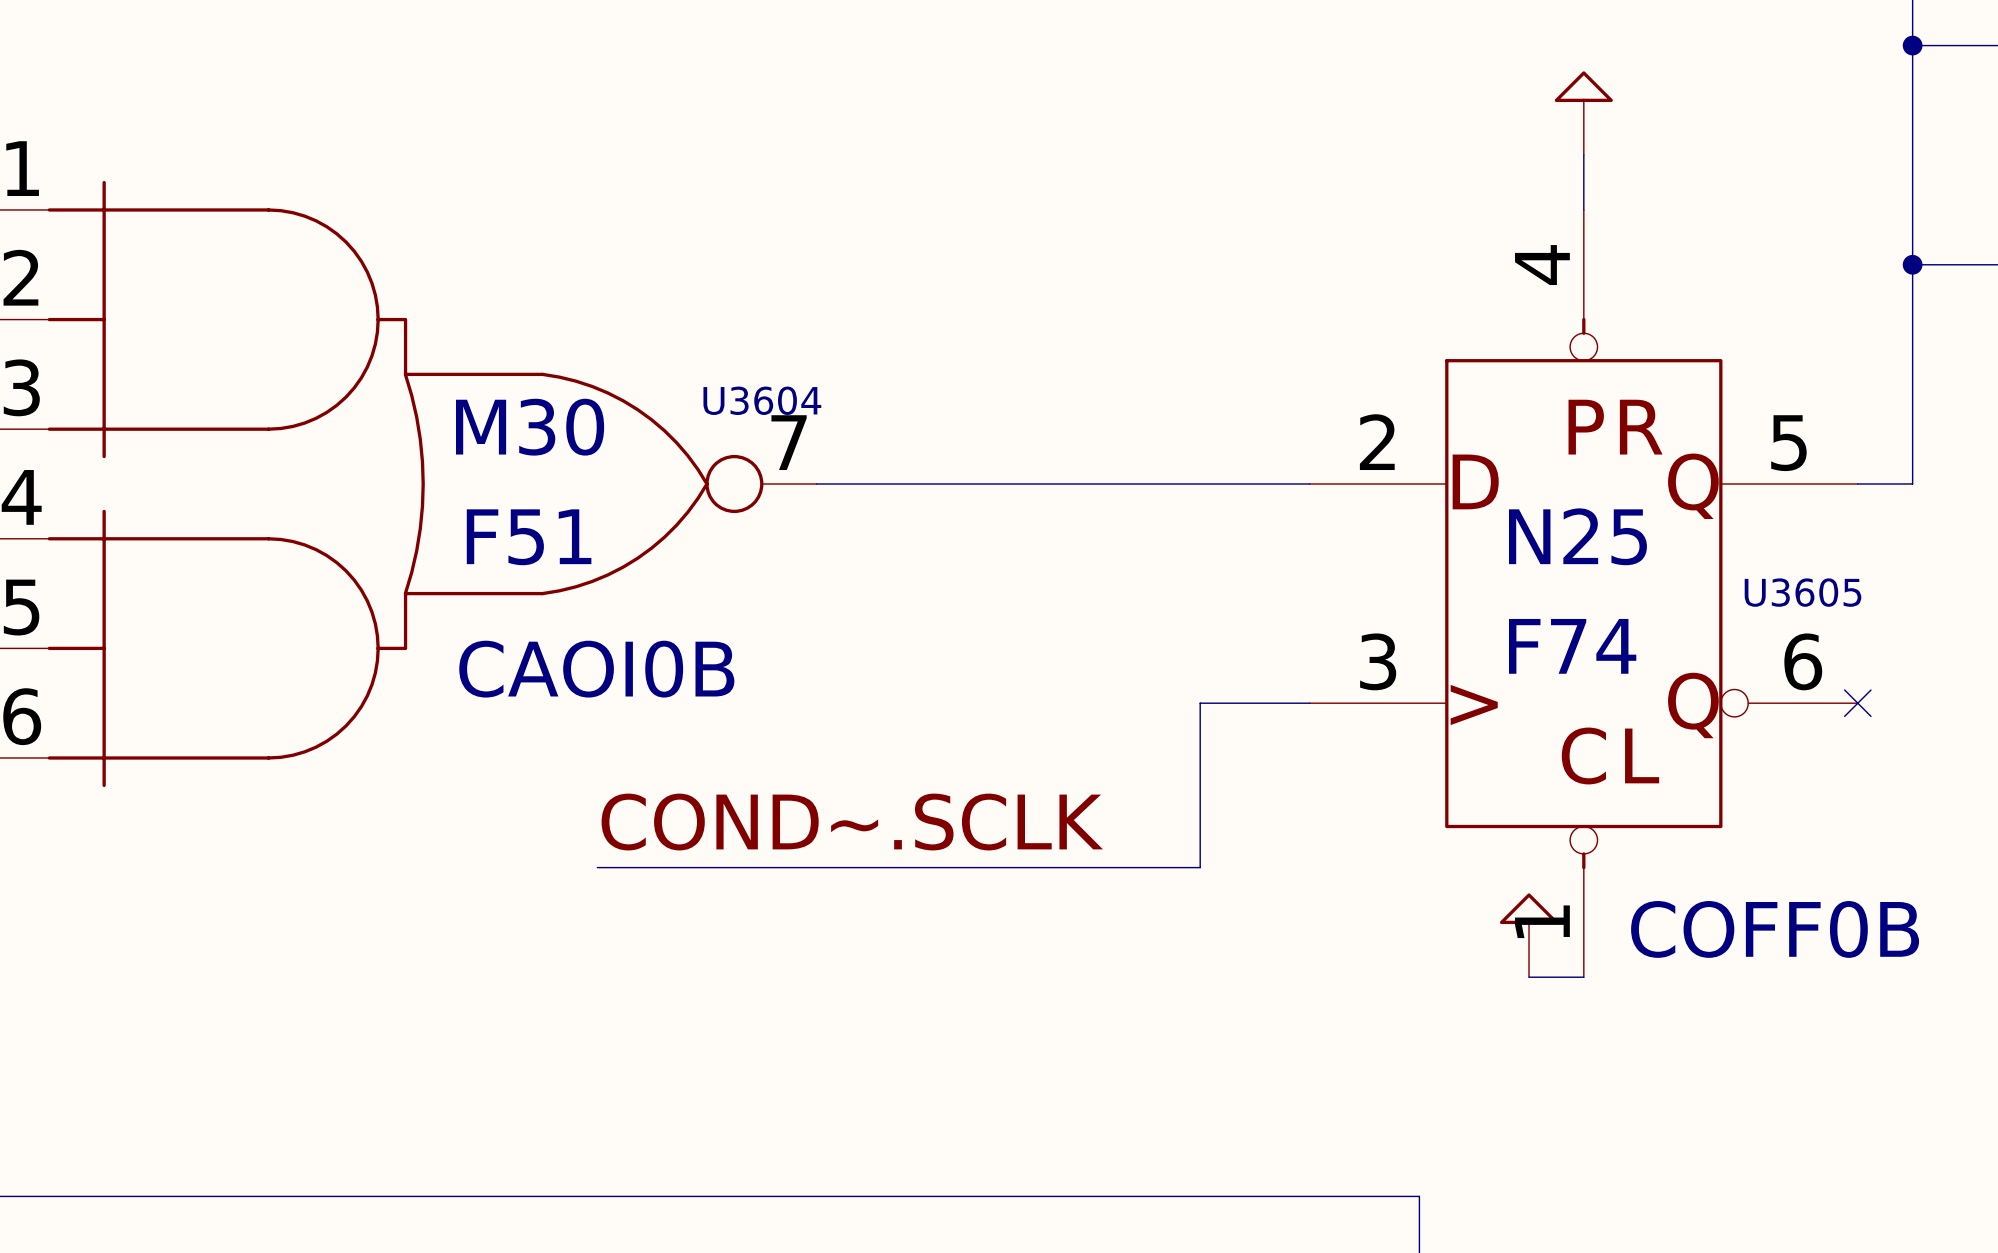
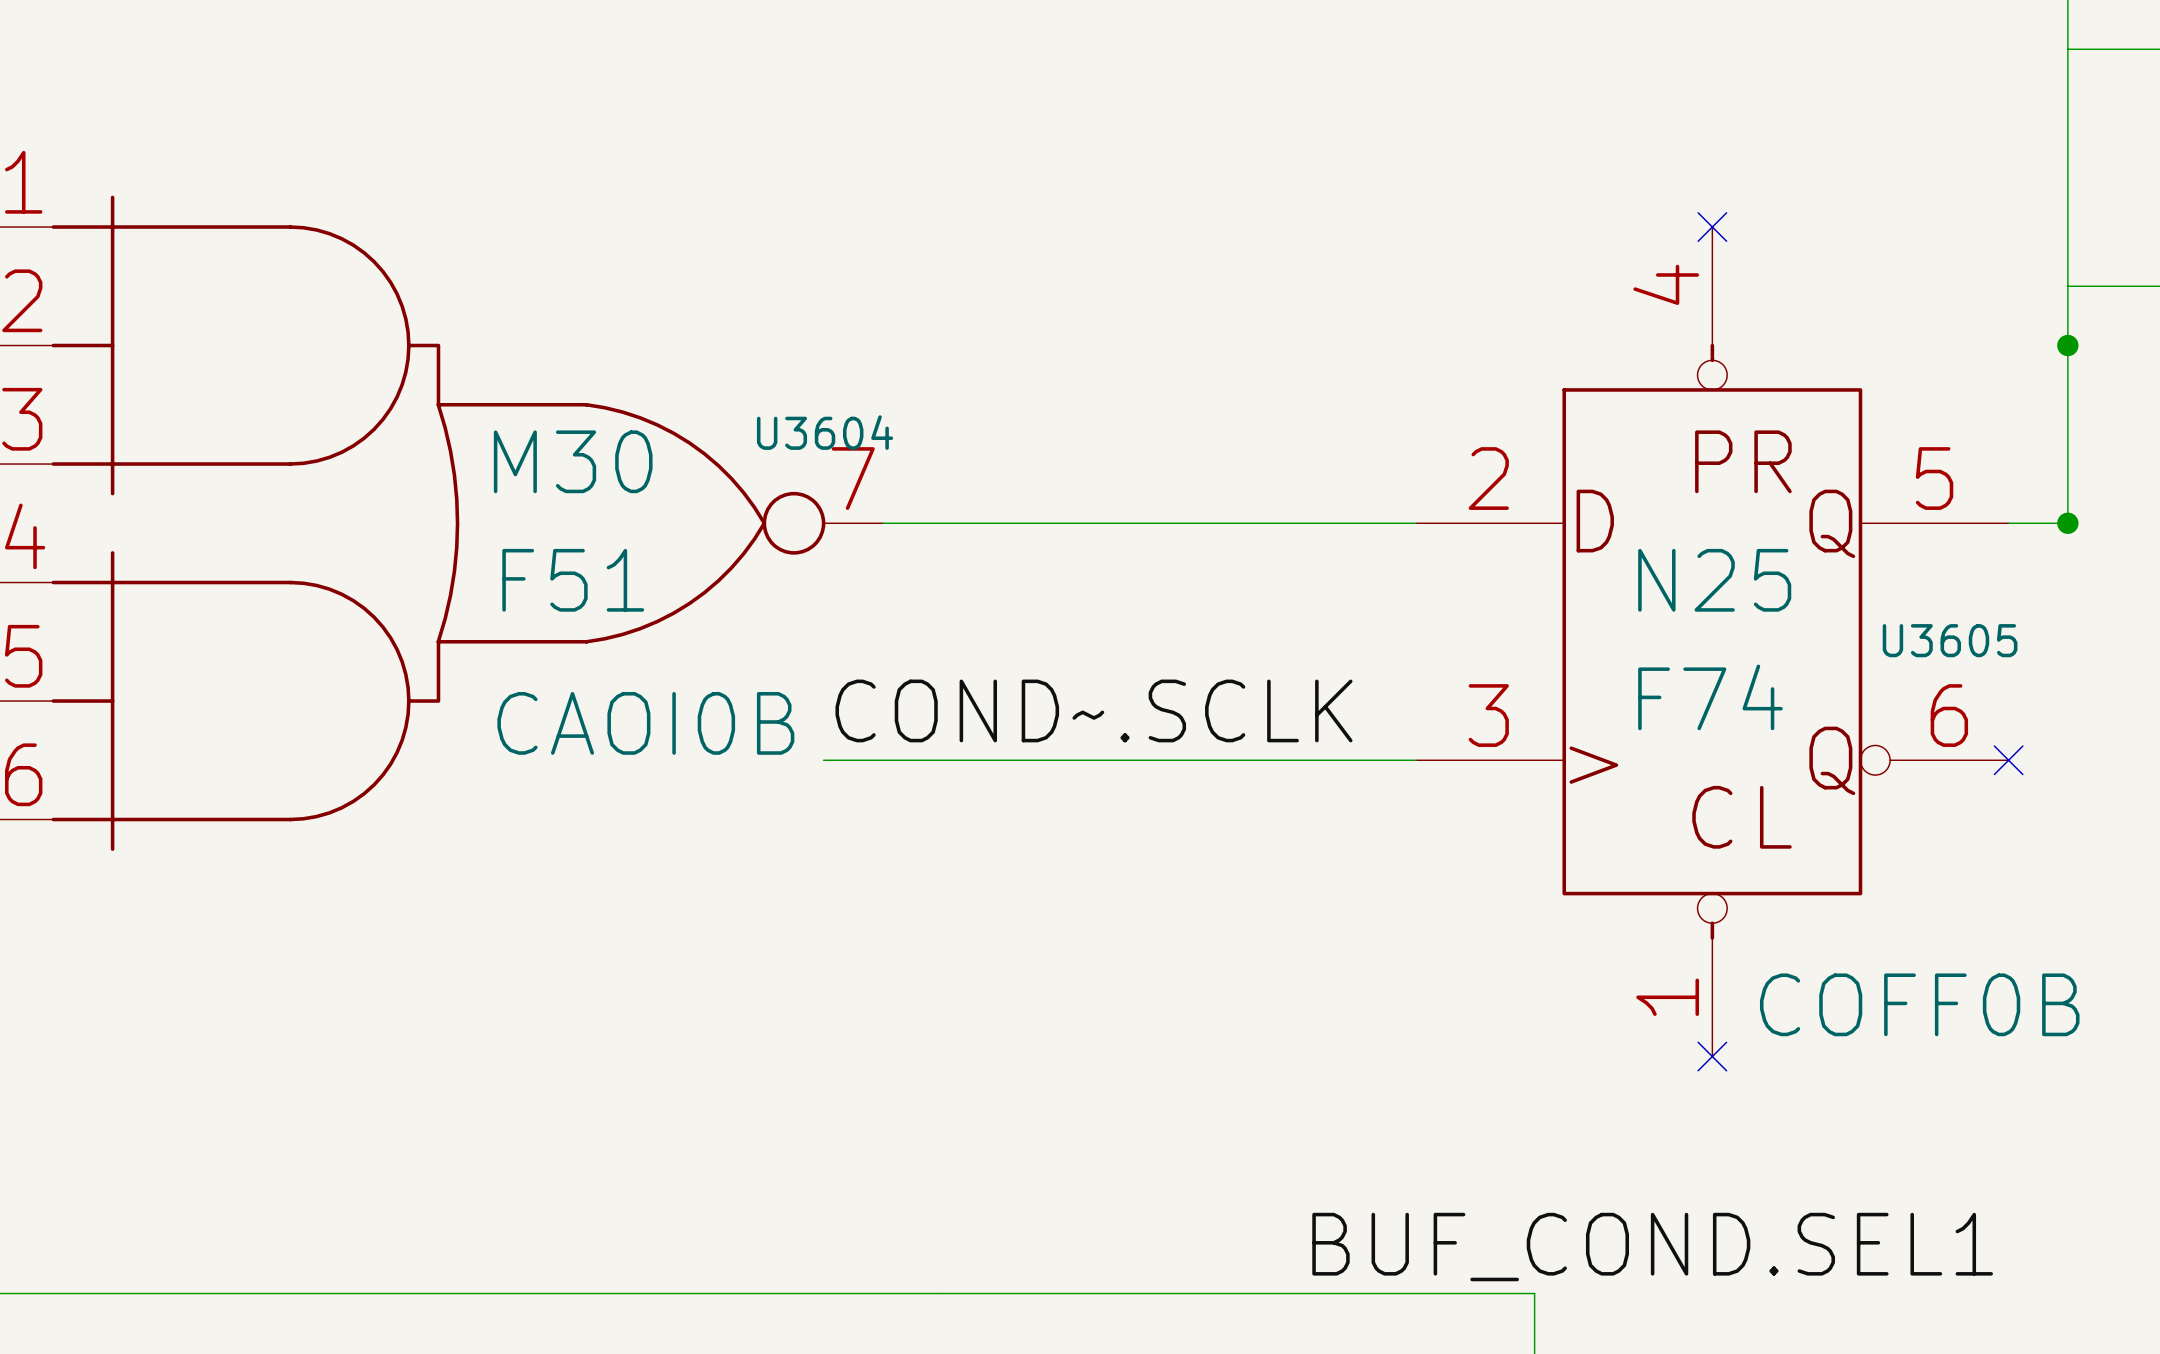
junction: (1912, 45) -> none
power symbol: (1583, 113) -> none
wire: (1583, 155) (1583, 209) -> none
no-connect mark: none -> (1712, 227)
junction position: (1912, 264) -> (2067, 345)
junction: none -> (2067, 523)
wire: (1200, 703) (1200, 867) (597, 867) -> (1297, 760) (823, 760)
label position: COND~.SCLK (852, 822) -> COND~.SCLK (1093, 710)
power symbol: (1529, 935) -> none
wire: (1529, 977) (1583, 977) -> none
no-connect mark: none -> (1712, 1056)
label: none -> BUF_COND.SEL1 (1652, 1247)

